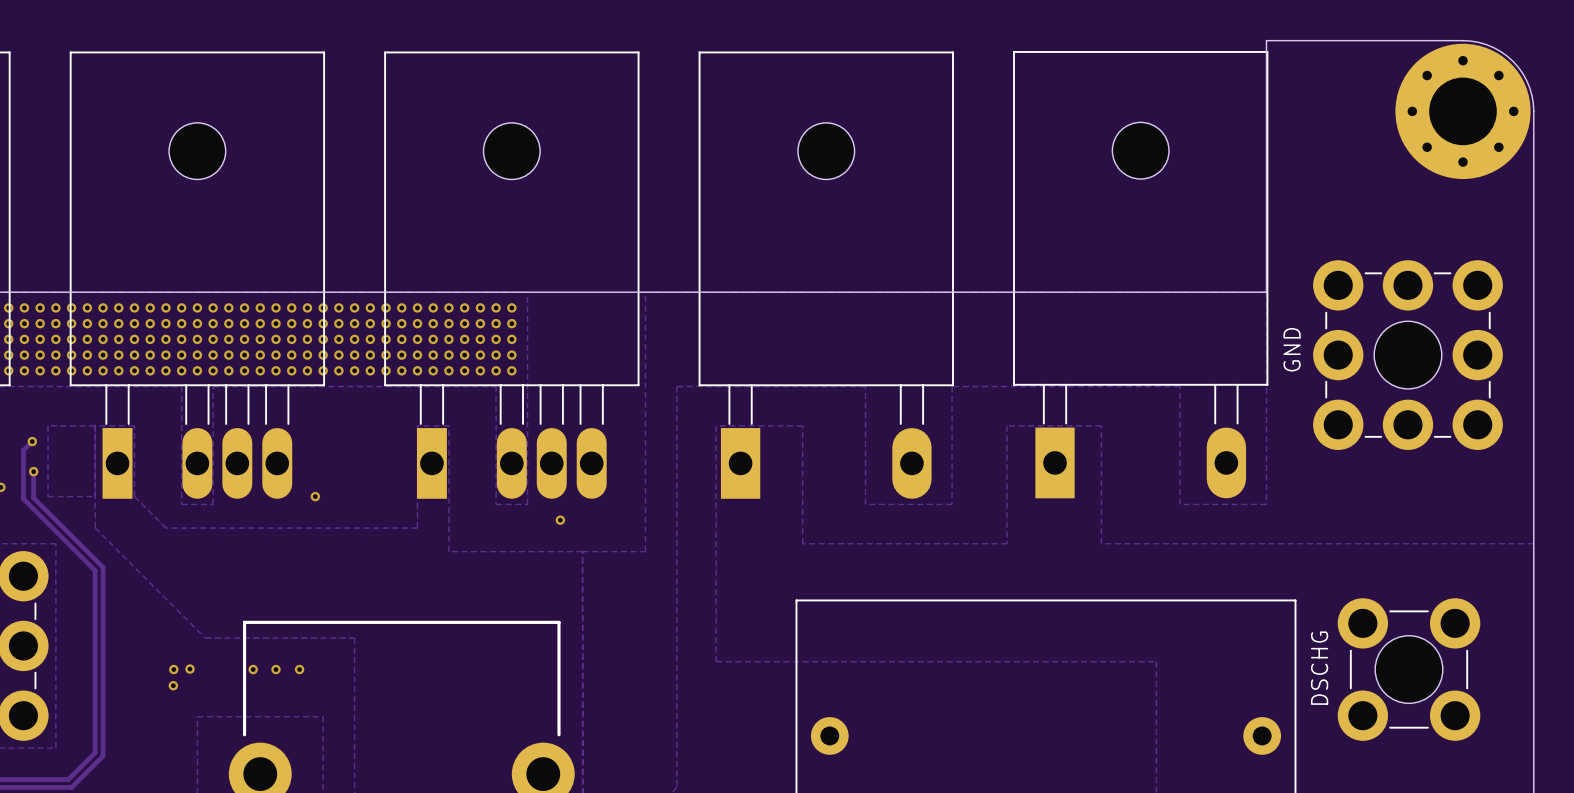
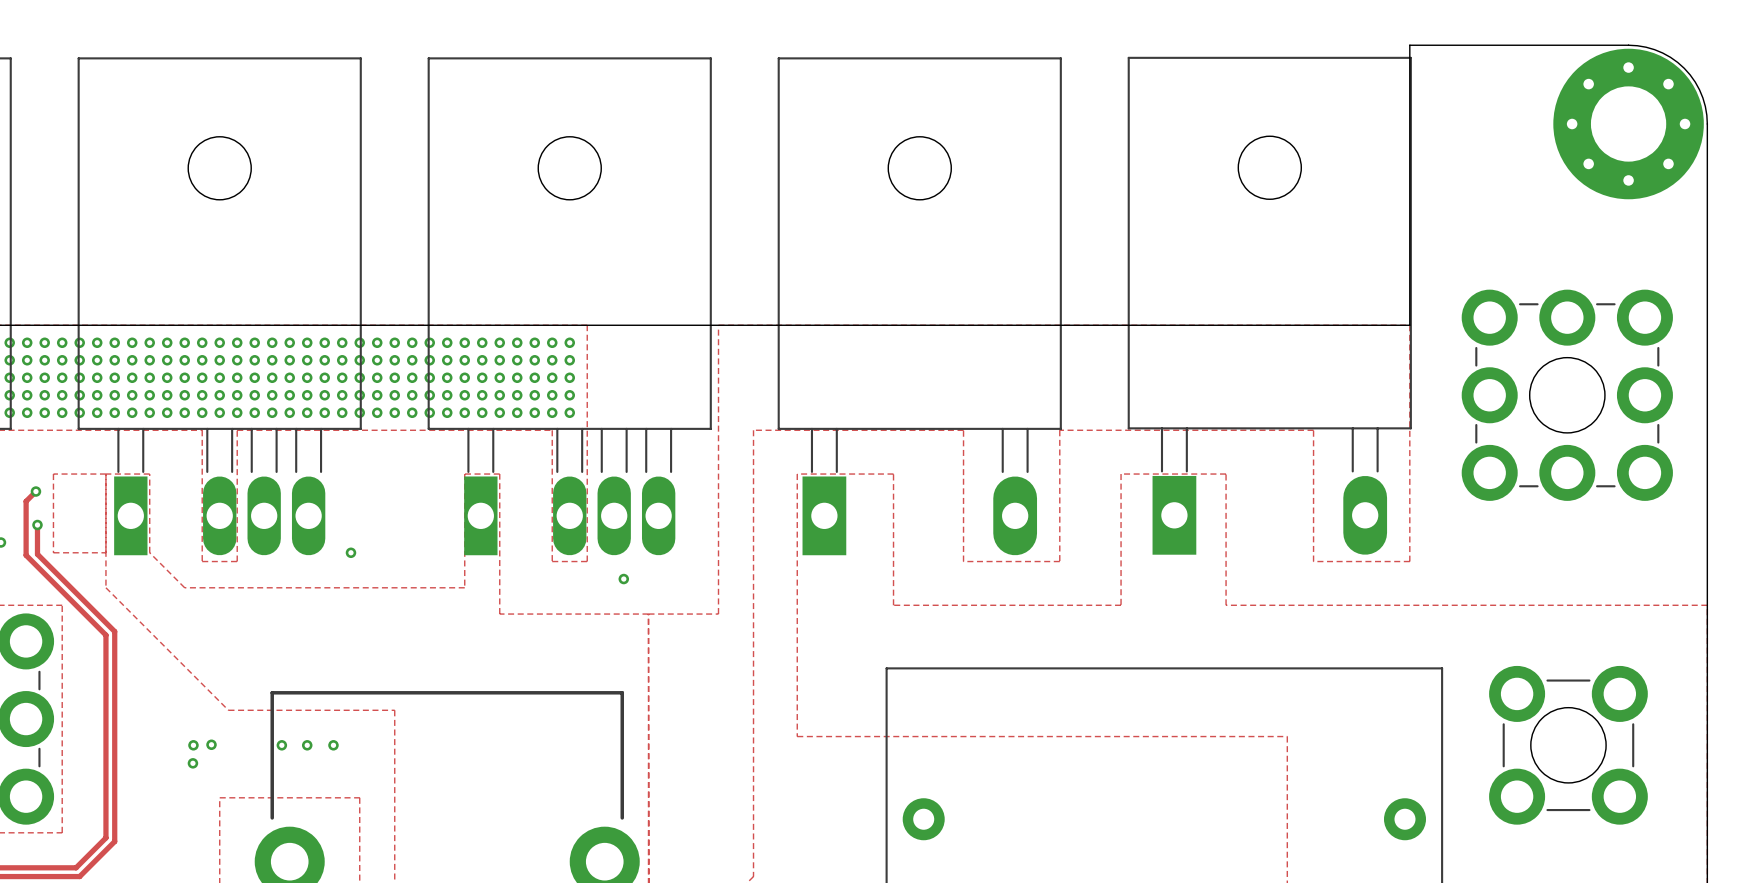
text: GND (1292, 349) -> none
text: DSCHG (1319, 668) -> none

